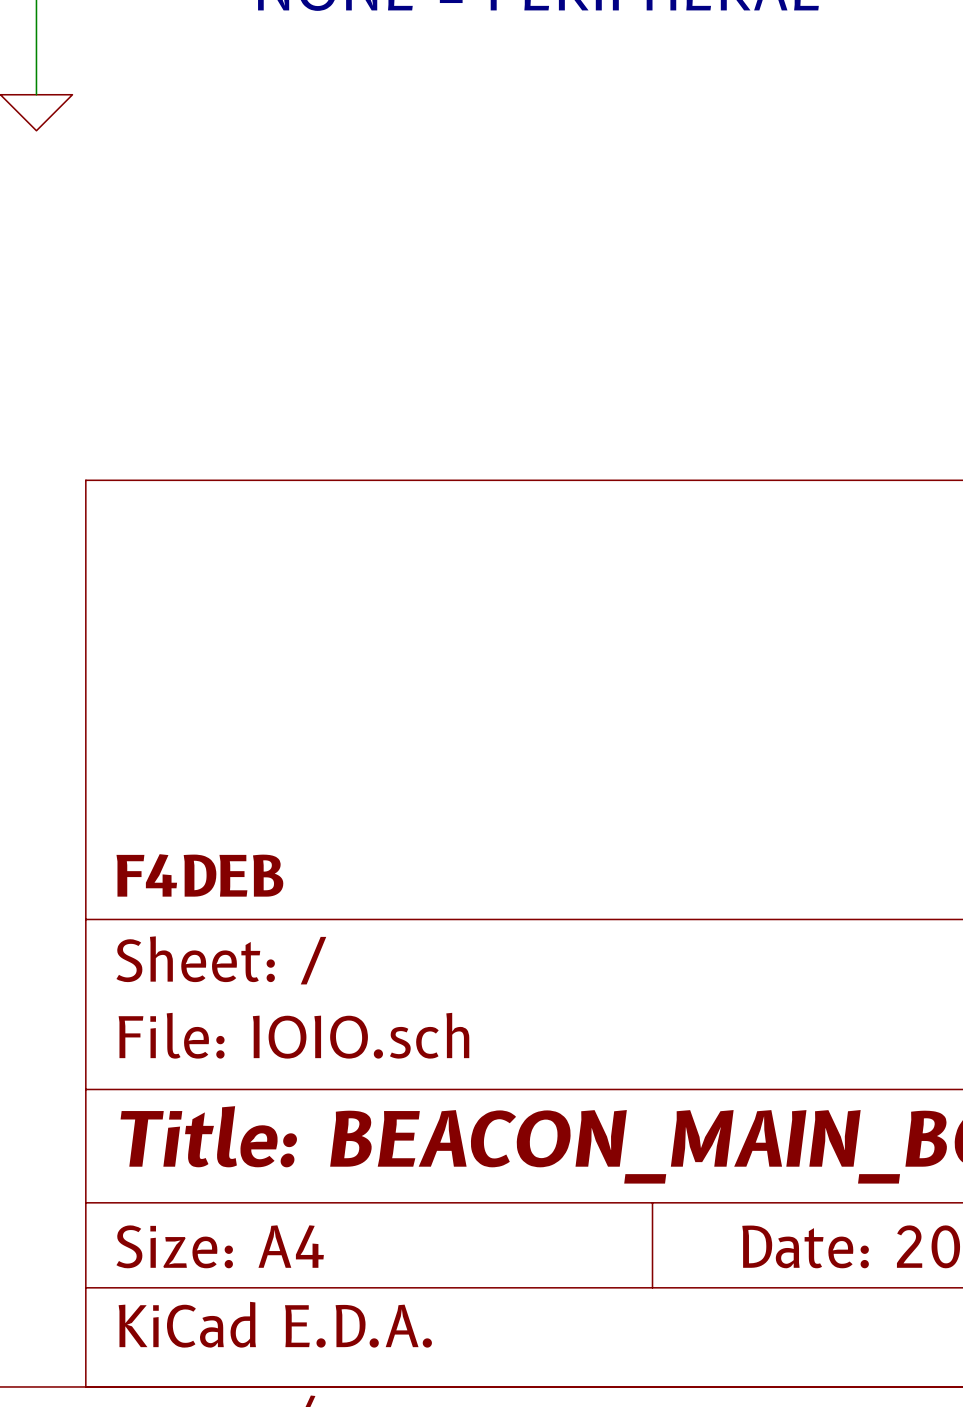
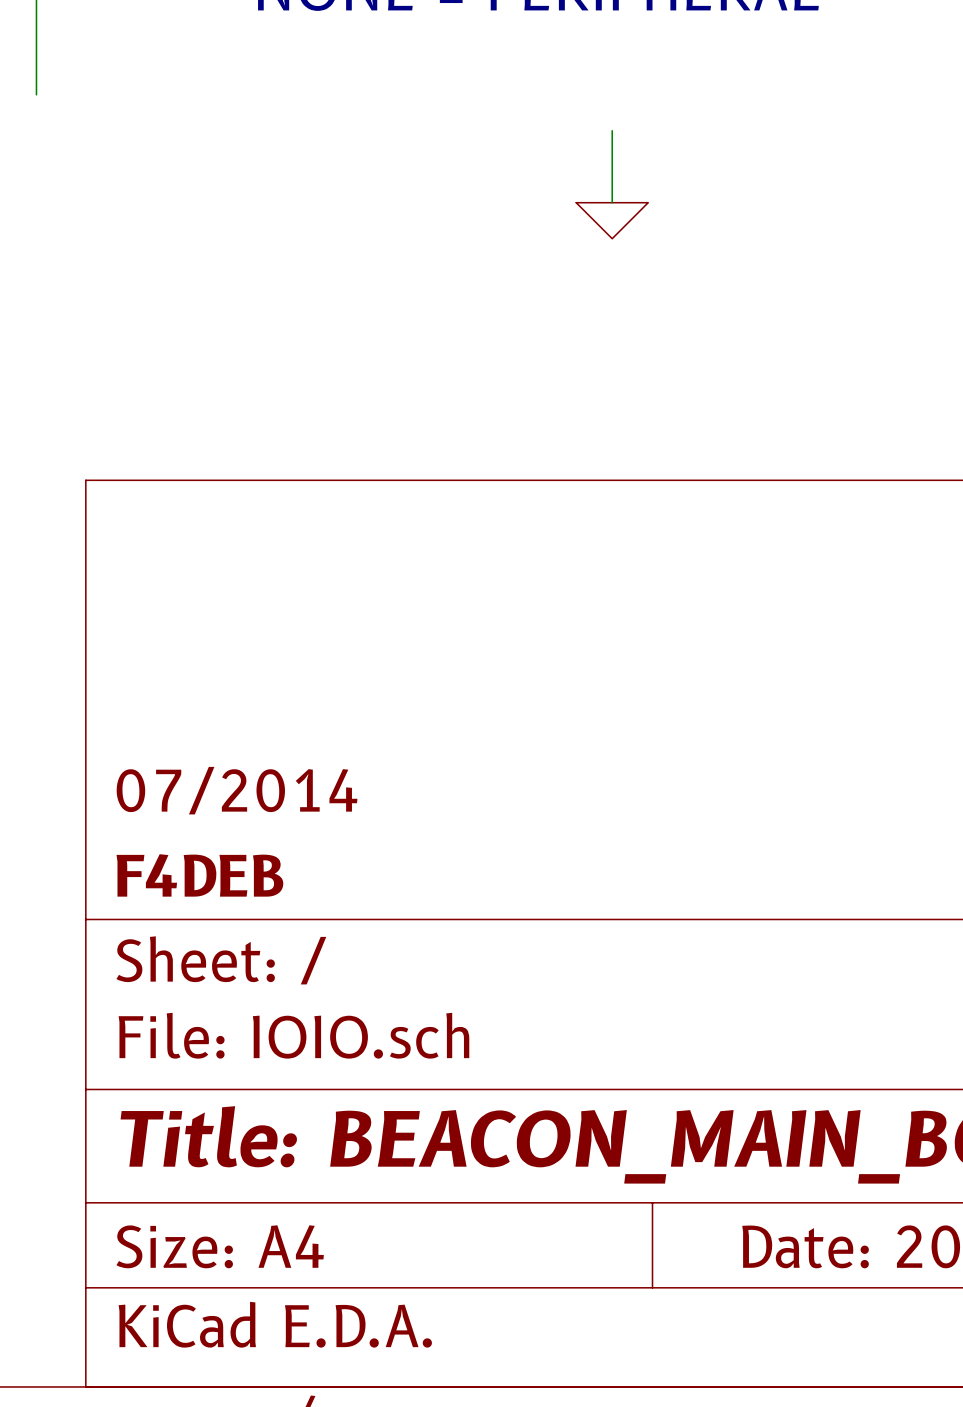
power symbol: (36, 112) -> none
wire: none -> (612, 130) (612, 202)
power symbol: none -> (612, 220)
title block: none -> 07/2014 (237, 790)

